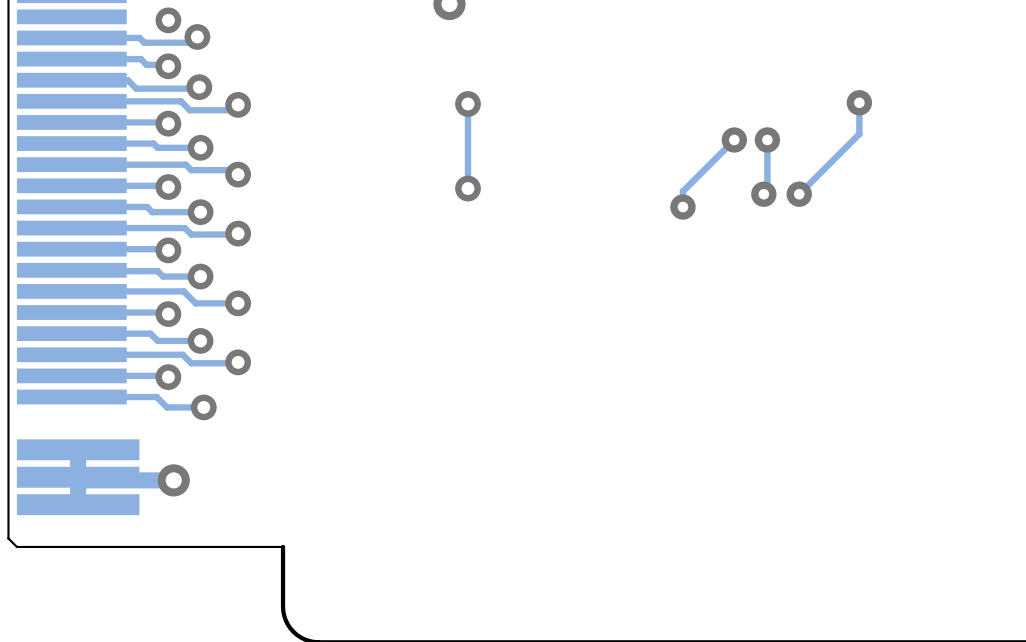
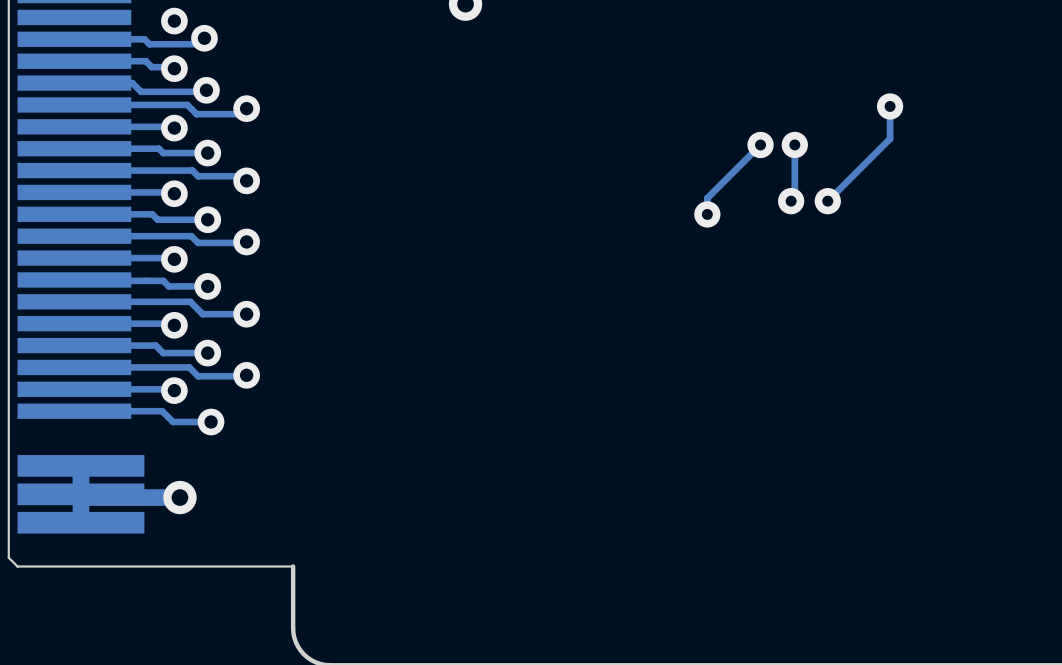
track: (467, 103) (467, 188) -> none
via: (467, 103) -> none
via: (467, 188) -> none

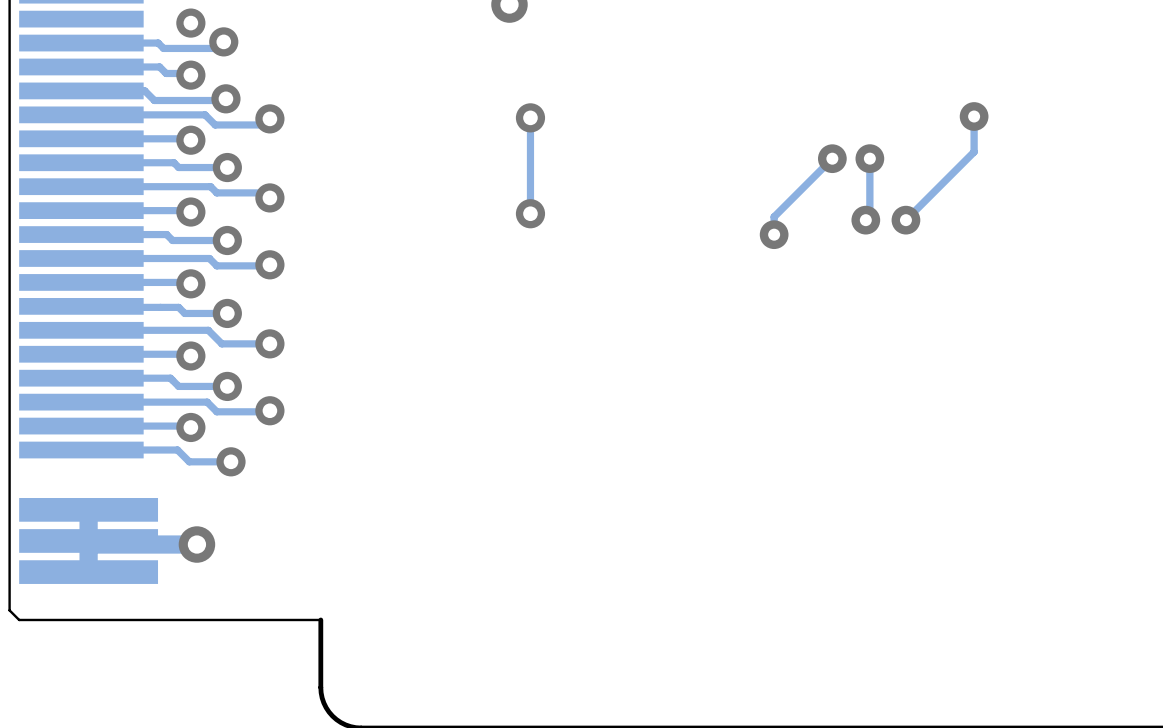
track: none -> (530, 117) (530, 213)
via: none -> (530, 117)
via: none -> (530, 213)

